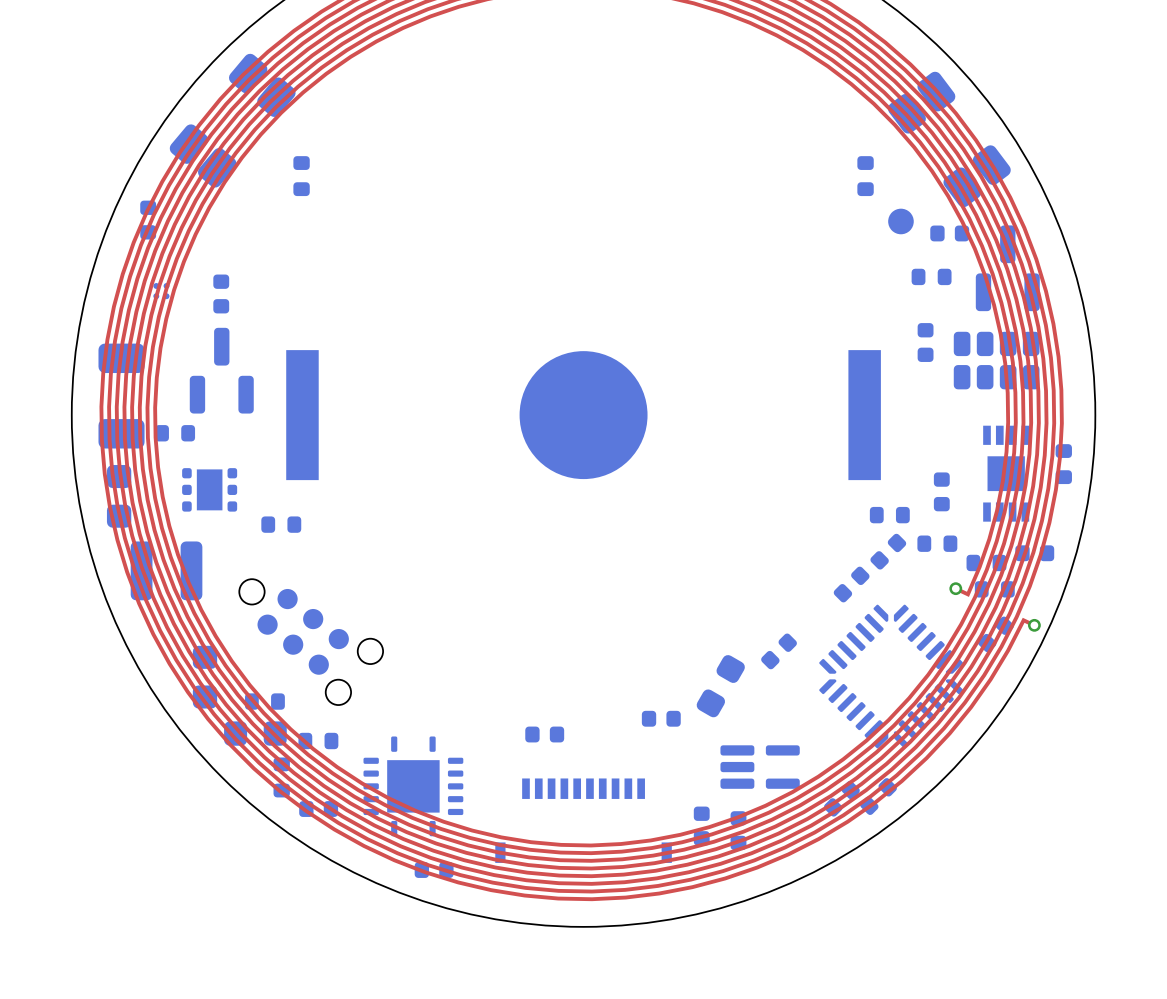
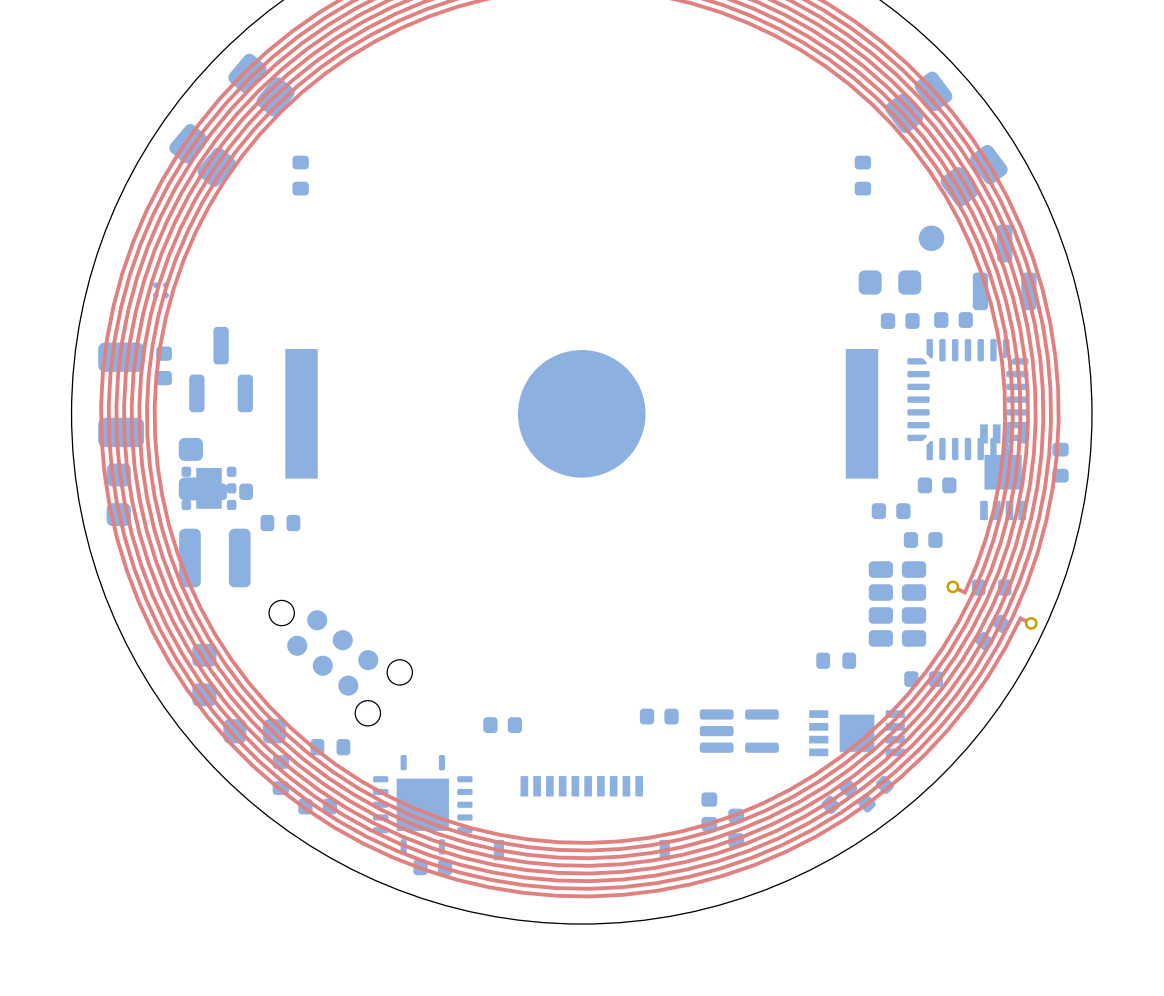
part: (148, 220) -> none
part: (900, 221) -> none
part footprint: [930, 225, 970, 242] -> [918, 225, 945, 252]
part: (931, 276) -> none
part: none -> (889, 282)
part: (221, 293) -> none
part: none -> (953, 320)
part: none -> (900, 321)
part: (925, 342) -> none
part rotation: 0° (996, 360) -> 90° clockwise (897, 603)
part position: (996, 360) -> (897, 603)
part: none -> (164, 365)
part: none -> (967, 399)
part position: (175, 433) -> (233, 491)
part: none -> (190, 469)
part rotation: 0° (941, 491) -> 90° clockwise (937, 485)
part footprint: [869, 506, 910, 524] -> [871, 503, 911, 520]
part footprint: [917, 535, 958, 552] -> [903, 532, 943, 548]
part: (888, 551) -> none
part: (1034, 553) -> none
part position: (986, 562) -> (836, 660)
part position: (166, 570) -> (214, 557)
part: (851, 584) -> none
part position: (311, 642) -> (340, 663)
part: (779, 651) -> none
part: (891, 676) -> none
part: none -> (923, 679)
part: (720, 686) -> none
part: (264, 701) -> none
part position: (544, 734) -> (502, 725)
part: none -> (856, 733)
part position: (318, 741) -> (330, 747)
part position: (760, 767) -> (739, 731)
part position: (413, 786) -> (422, 804)
part position: (701, 826) -> (709, 811)

